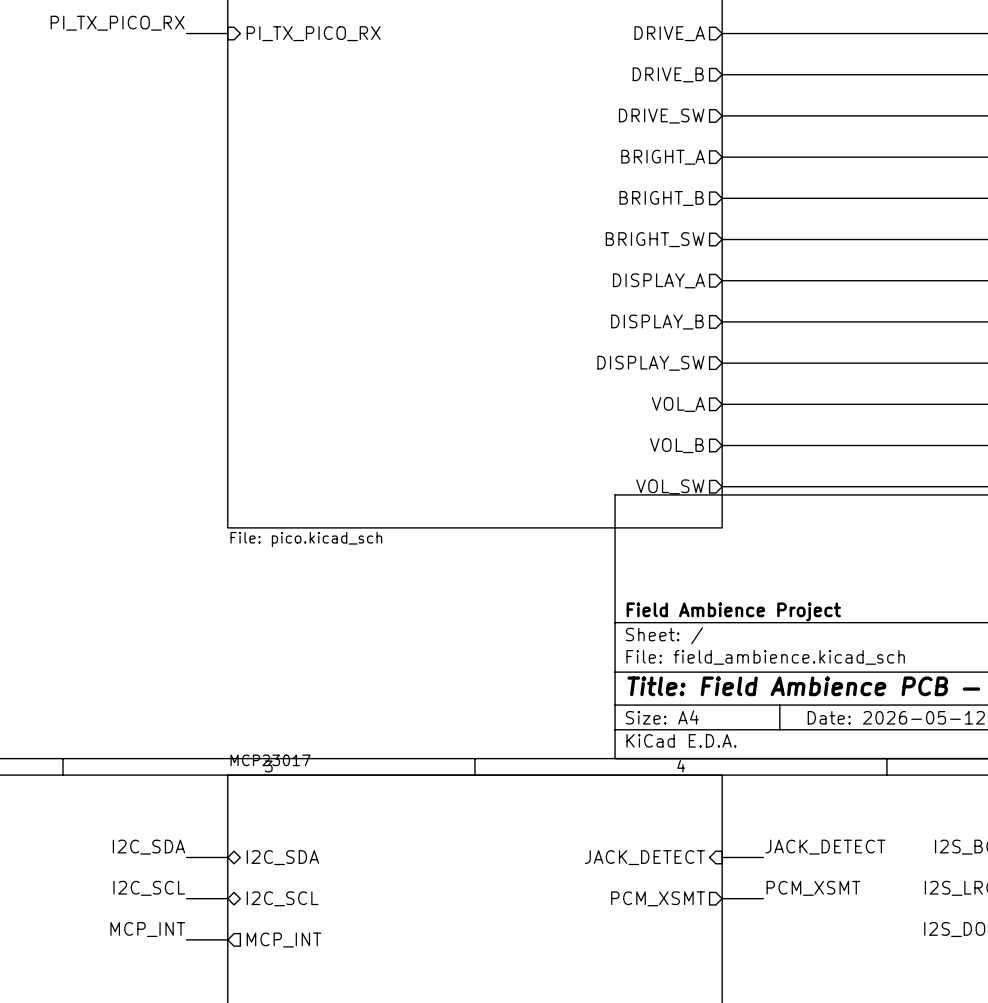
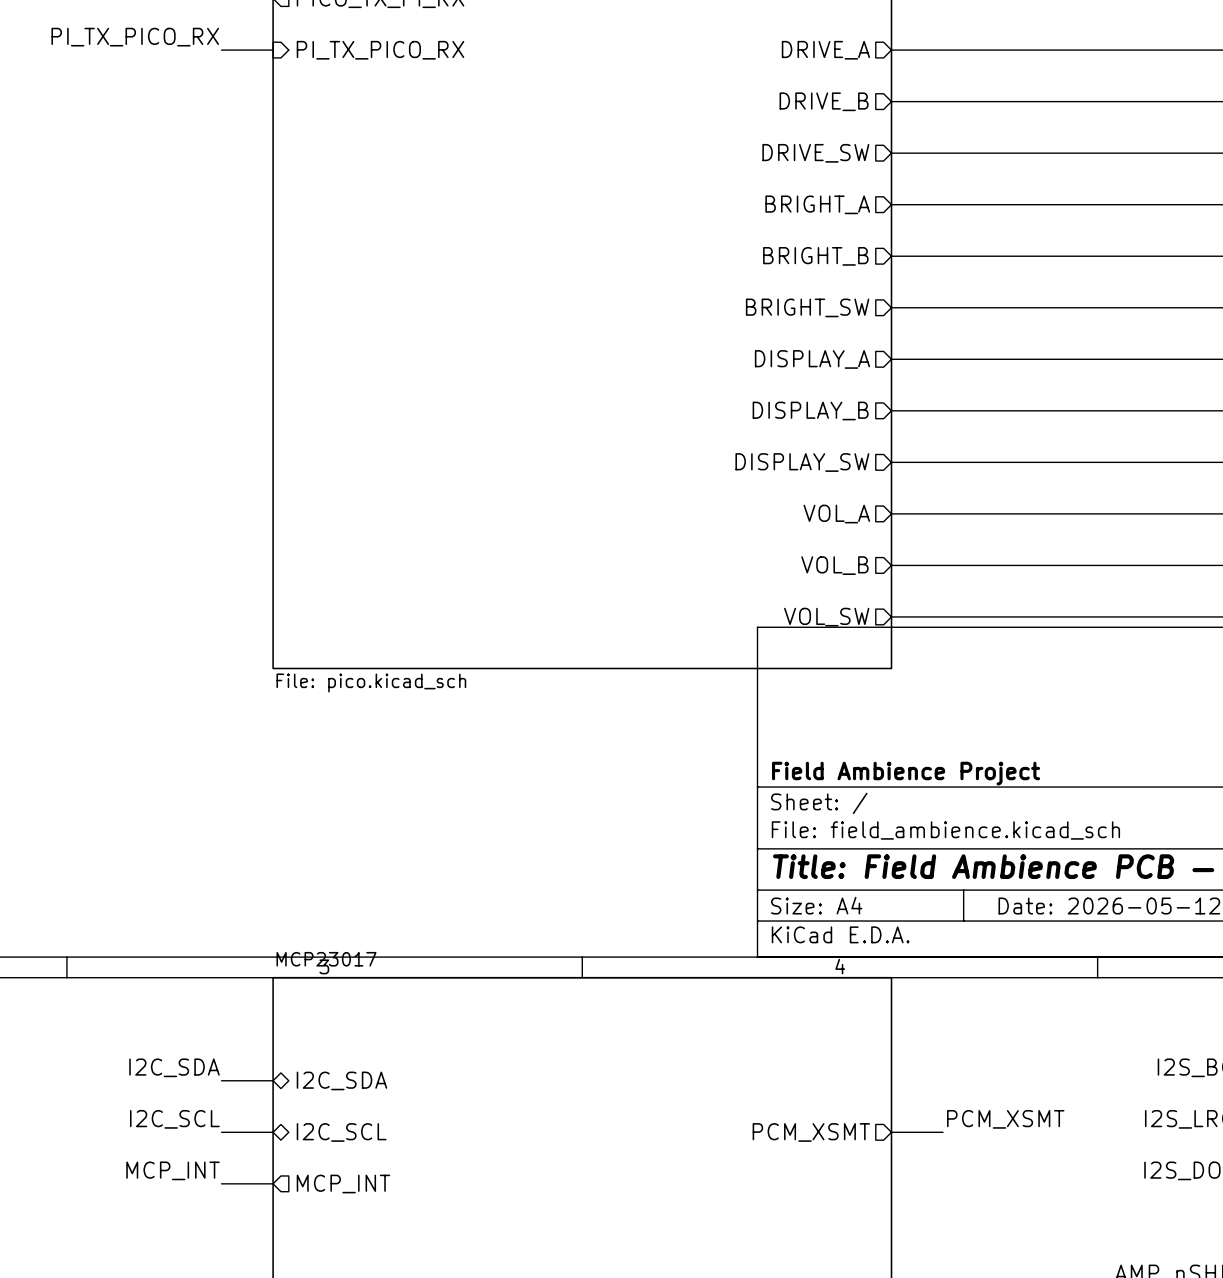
label: JACK_DETECT (825, 847) -> none
sheet pin: JACK_DETECT (644, 857) -> none
wire: (722, 857) (763, 857) -> none

